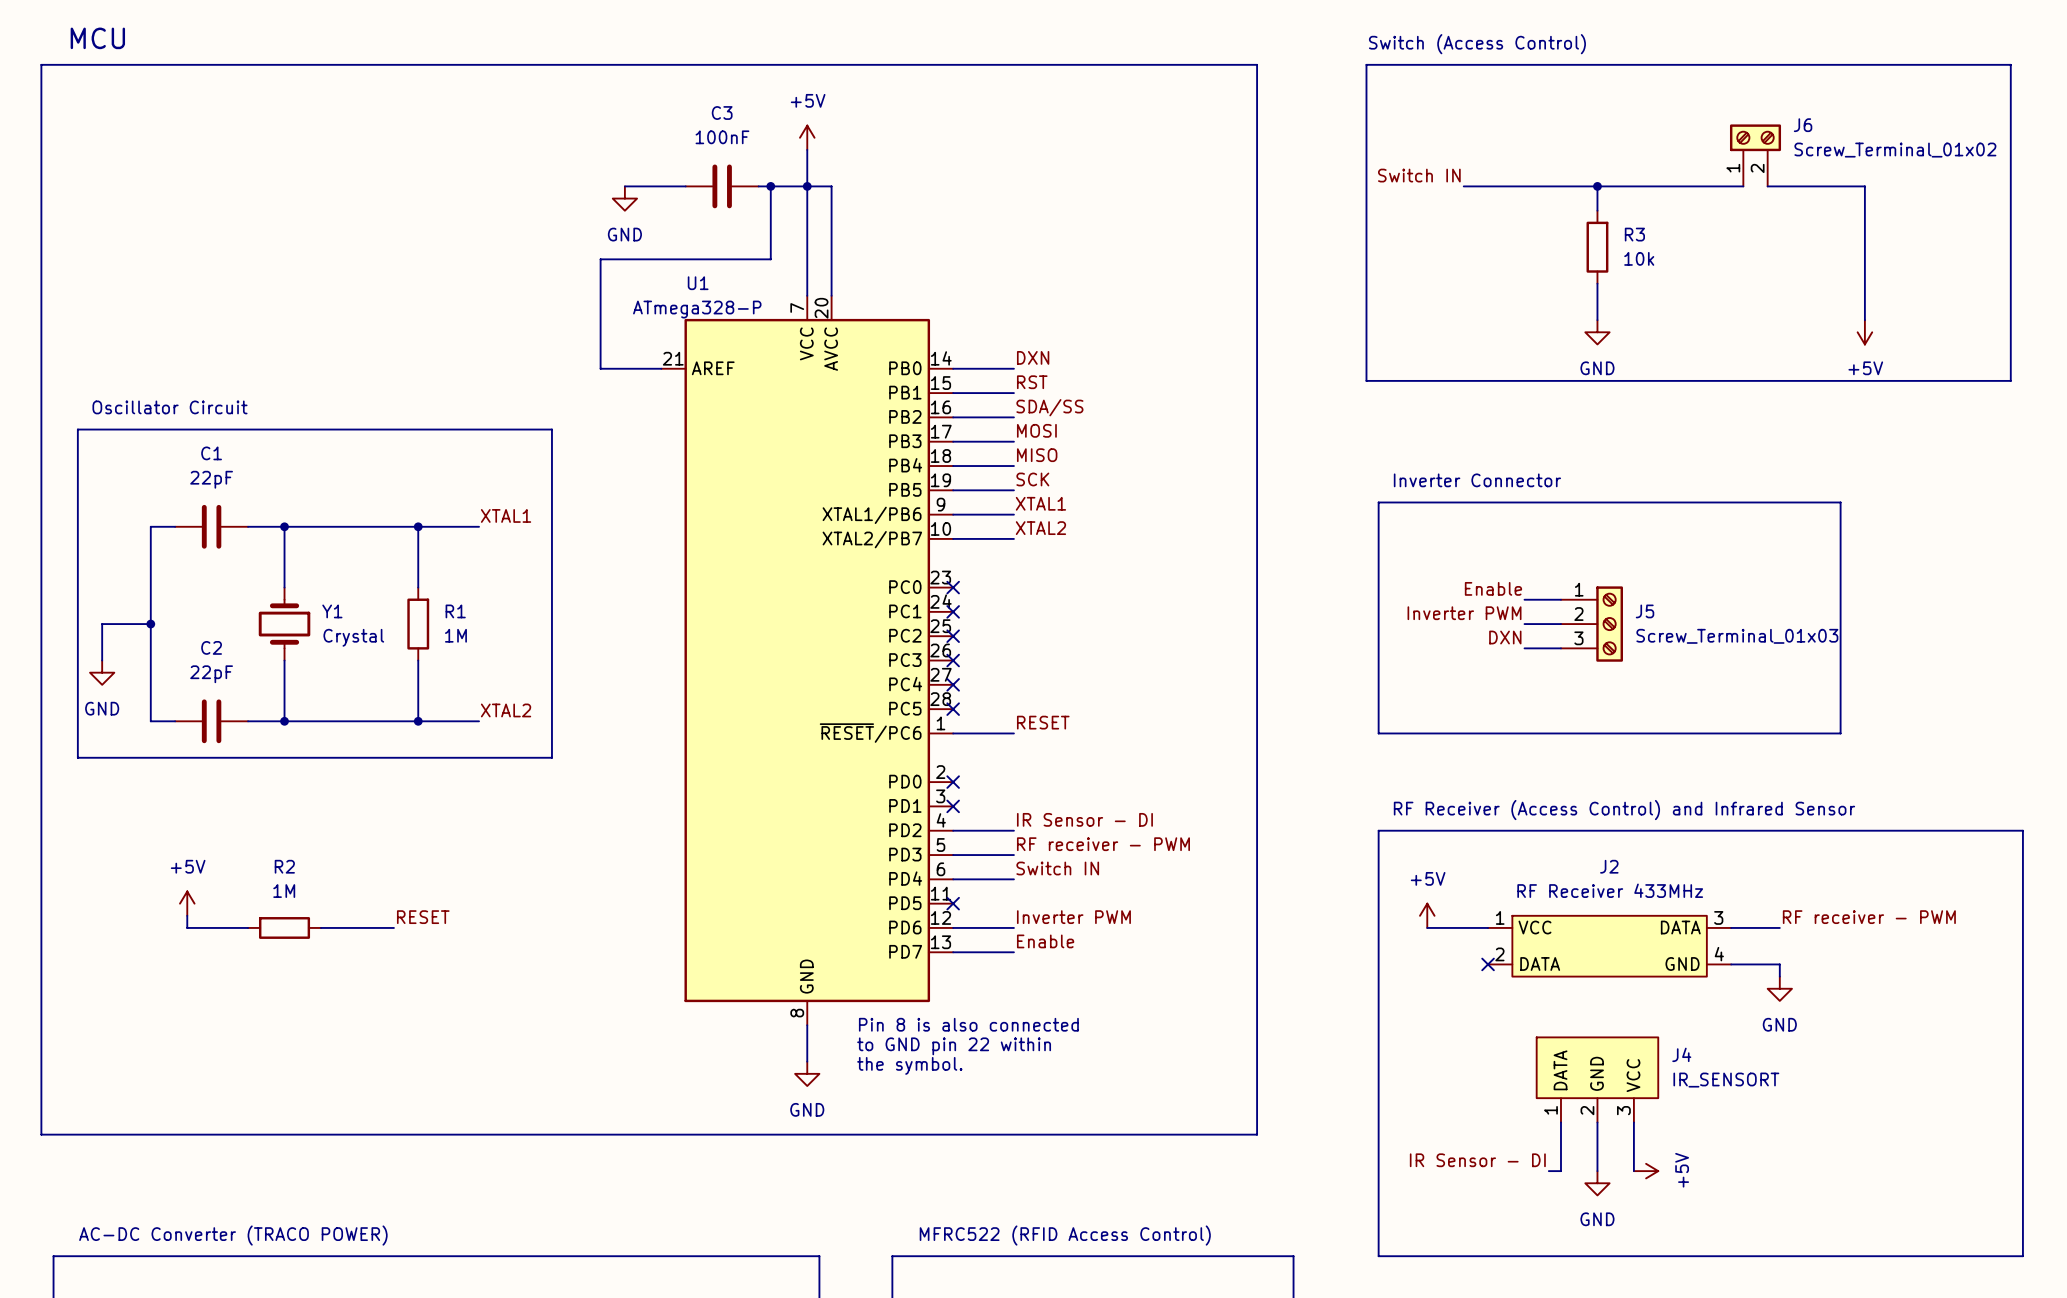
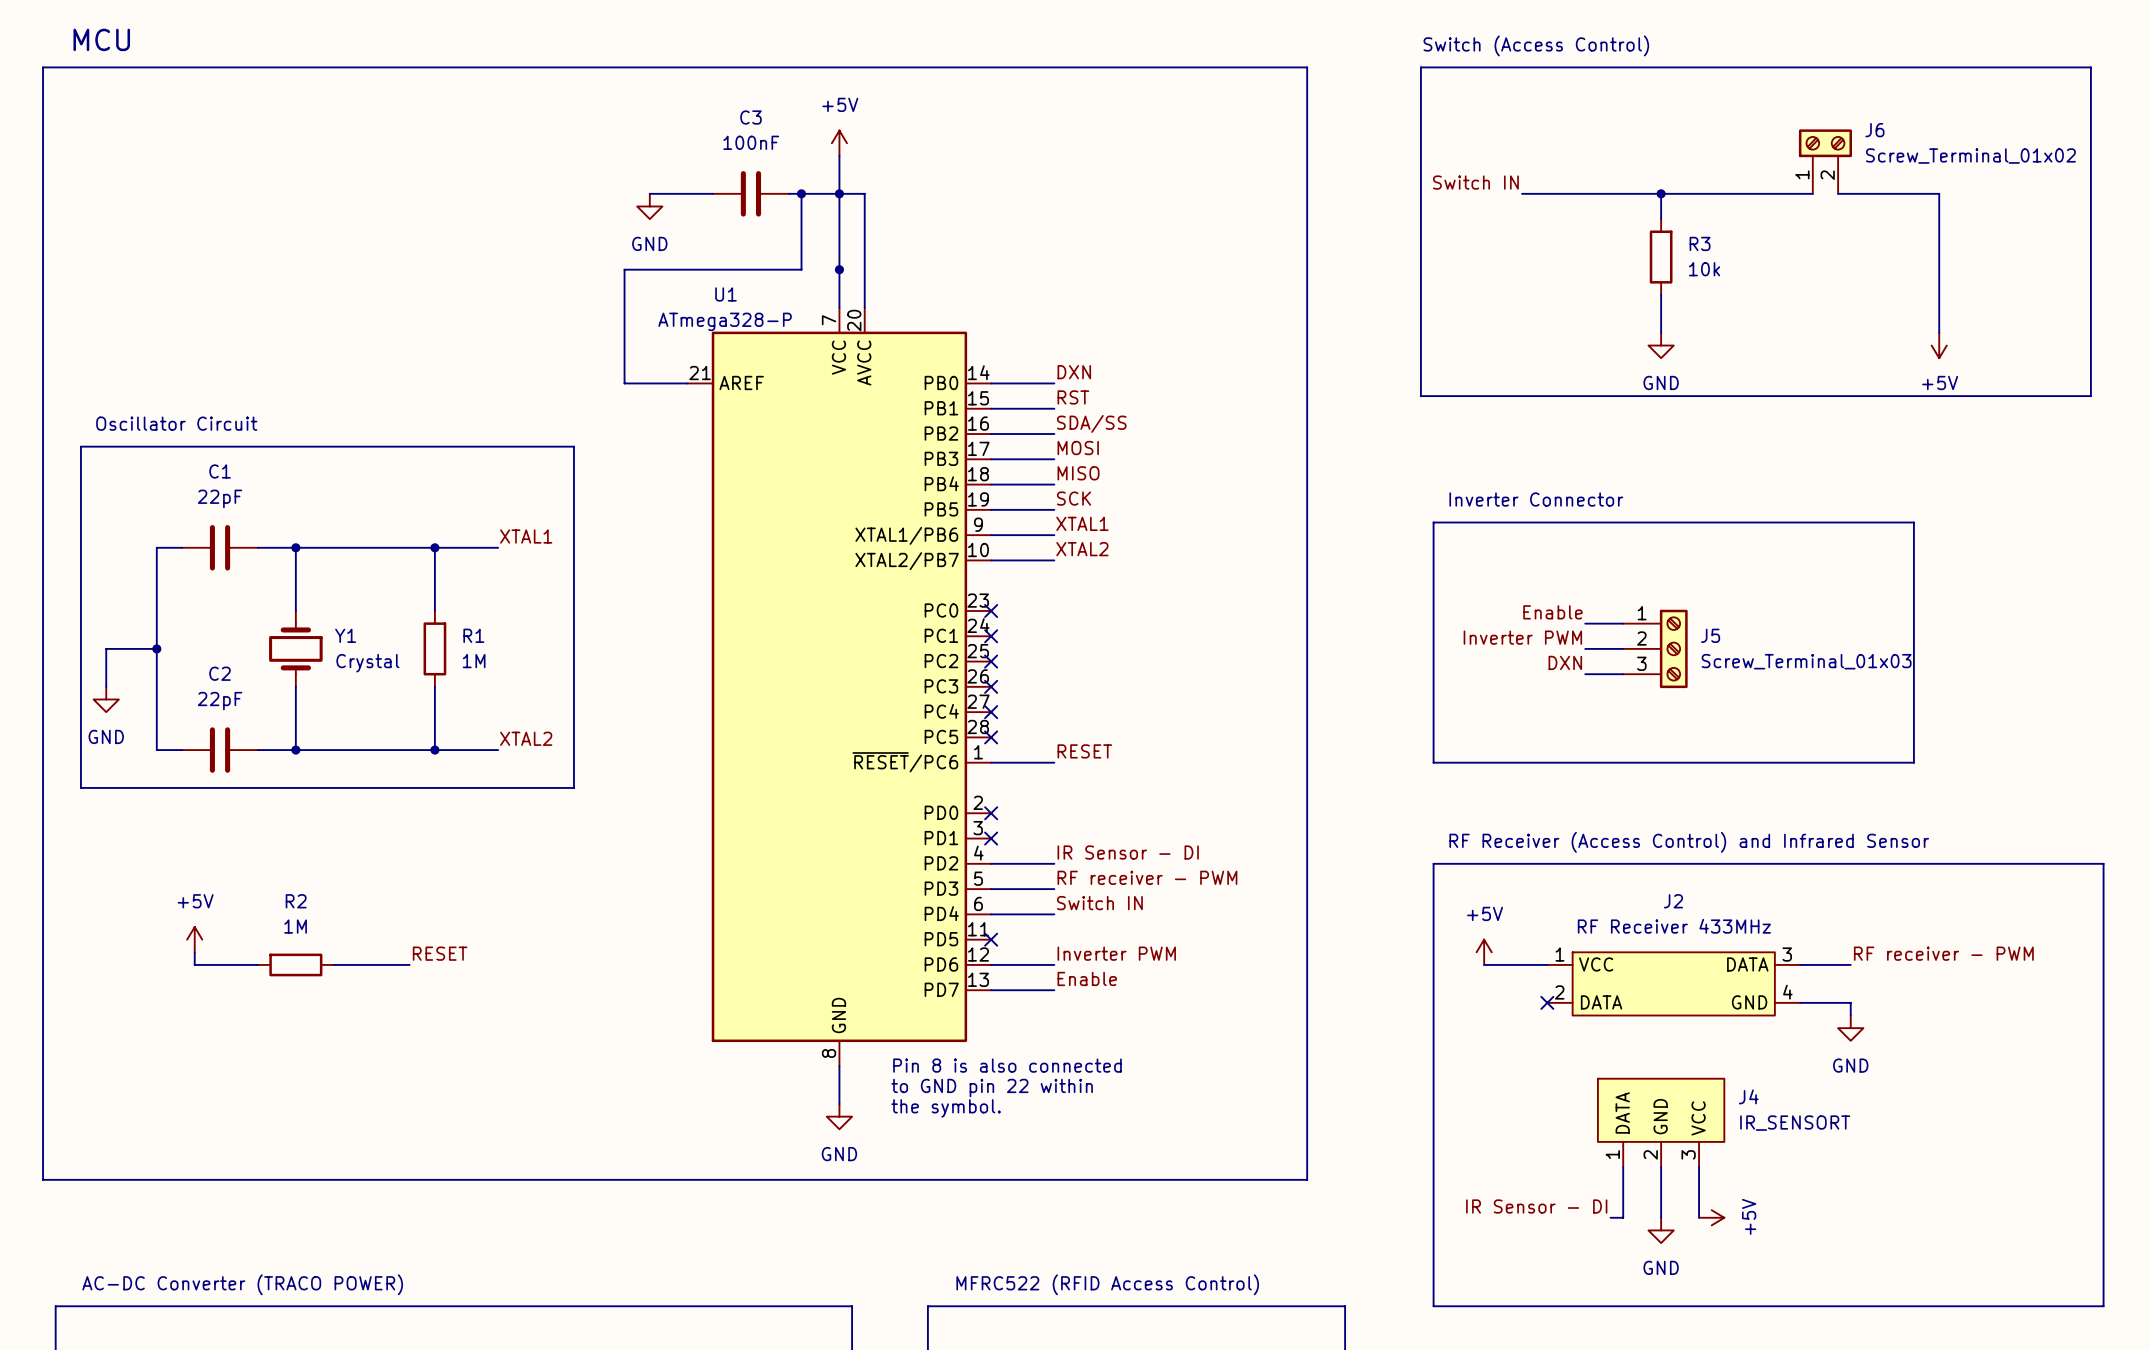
junction: none -> (839, 269)

